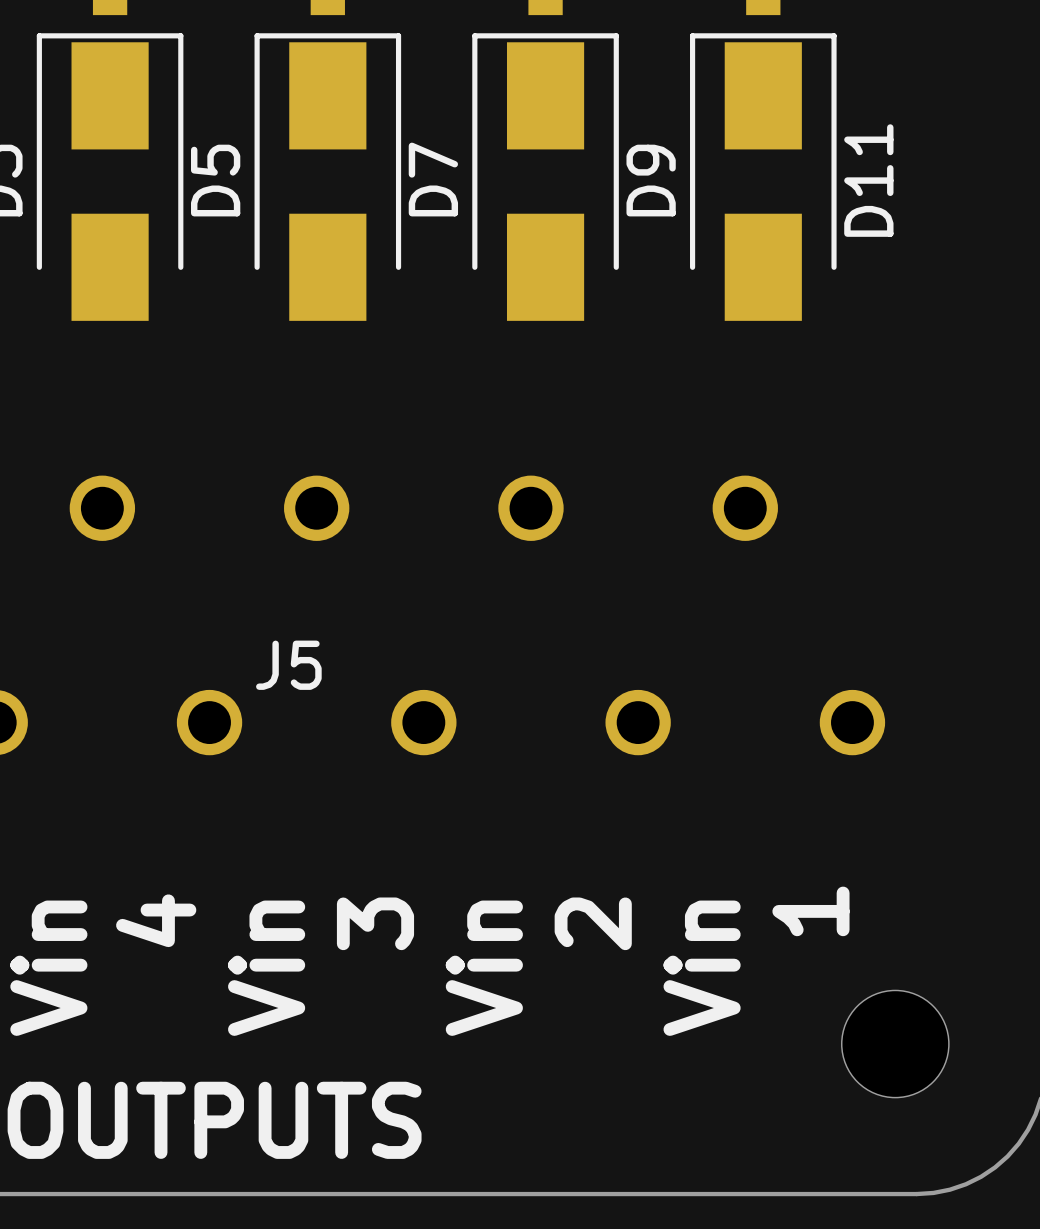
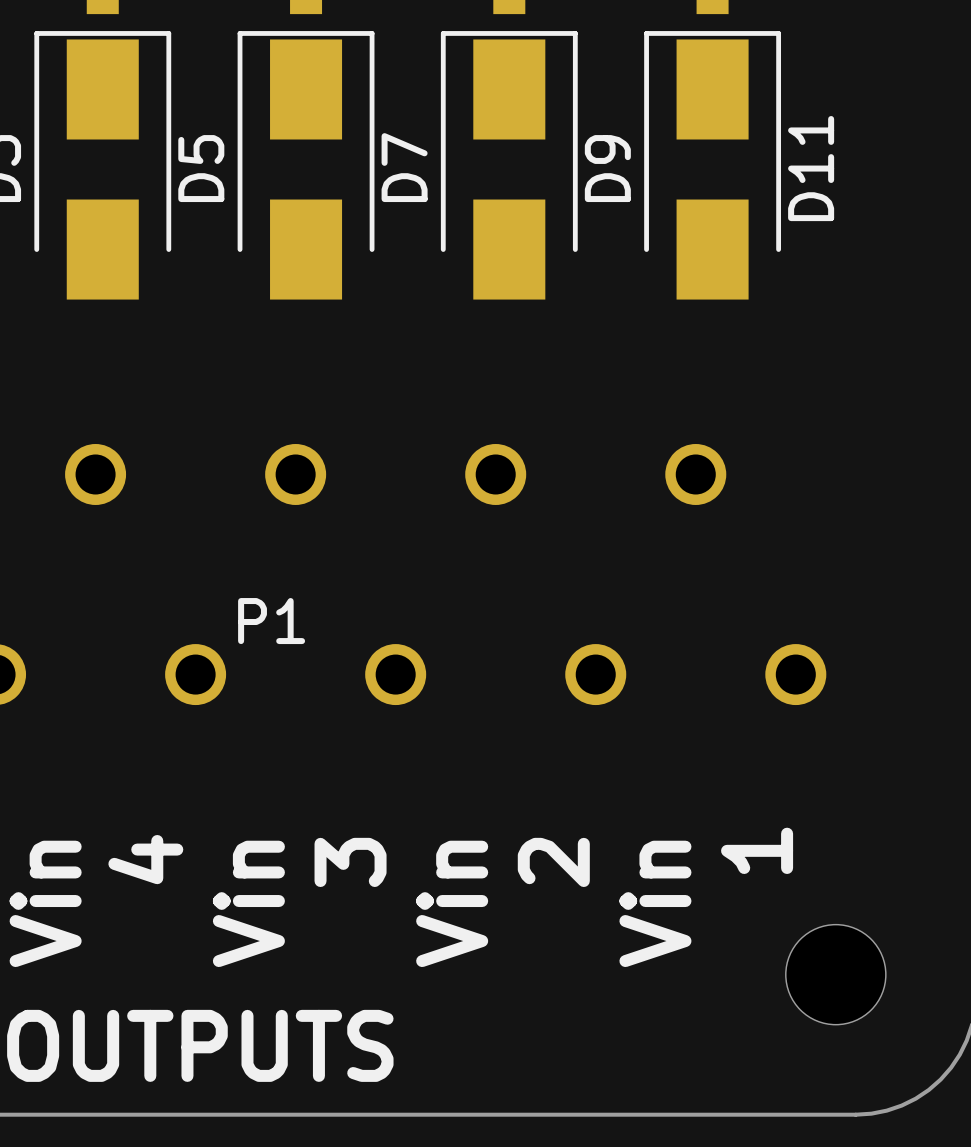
J5 name: J5 (288, 665) -> P1 (271, 621)

